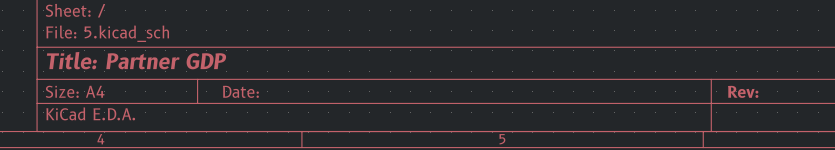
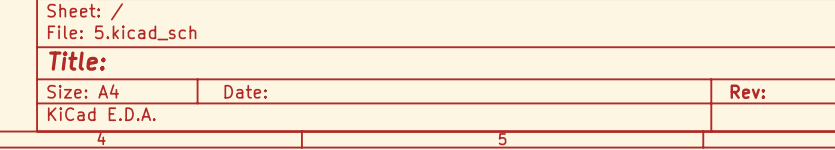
title block: Title: Partner GDP (136, 60) -> Title: (77, 61)

